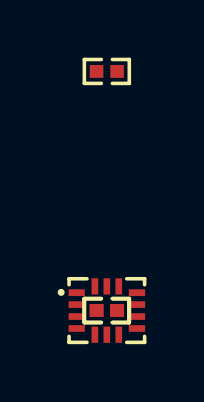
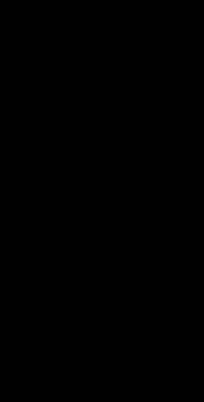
part: (106, 71) -> none
part: (102, 310) -> none
part: (106, 310) -> none

